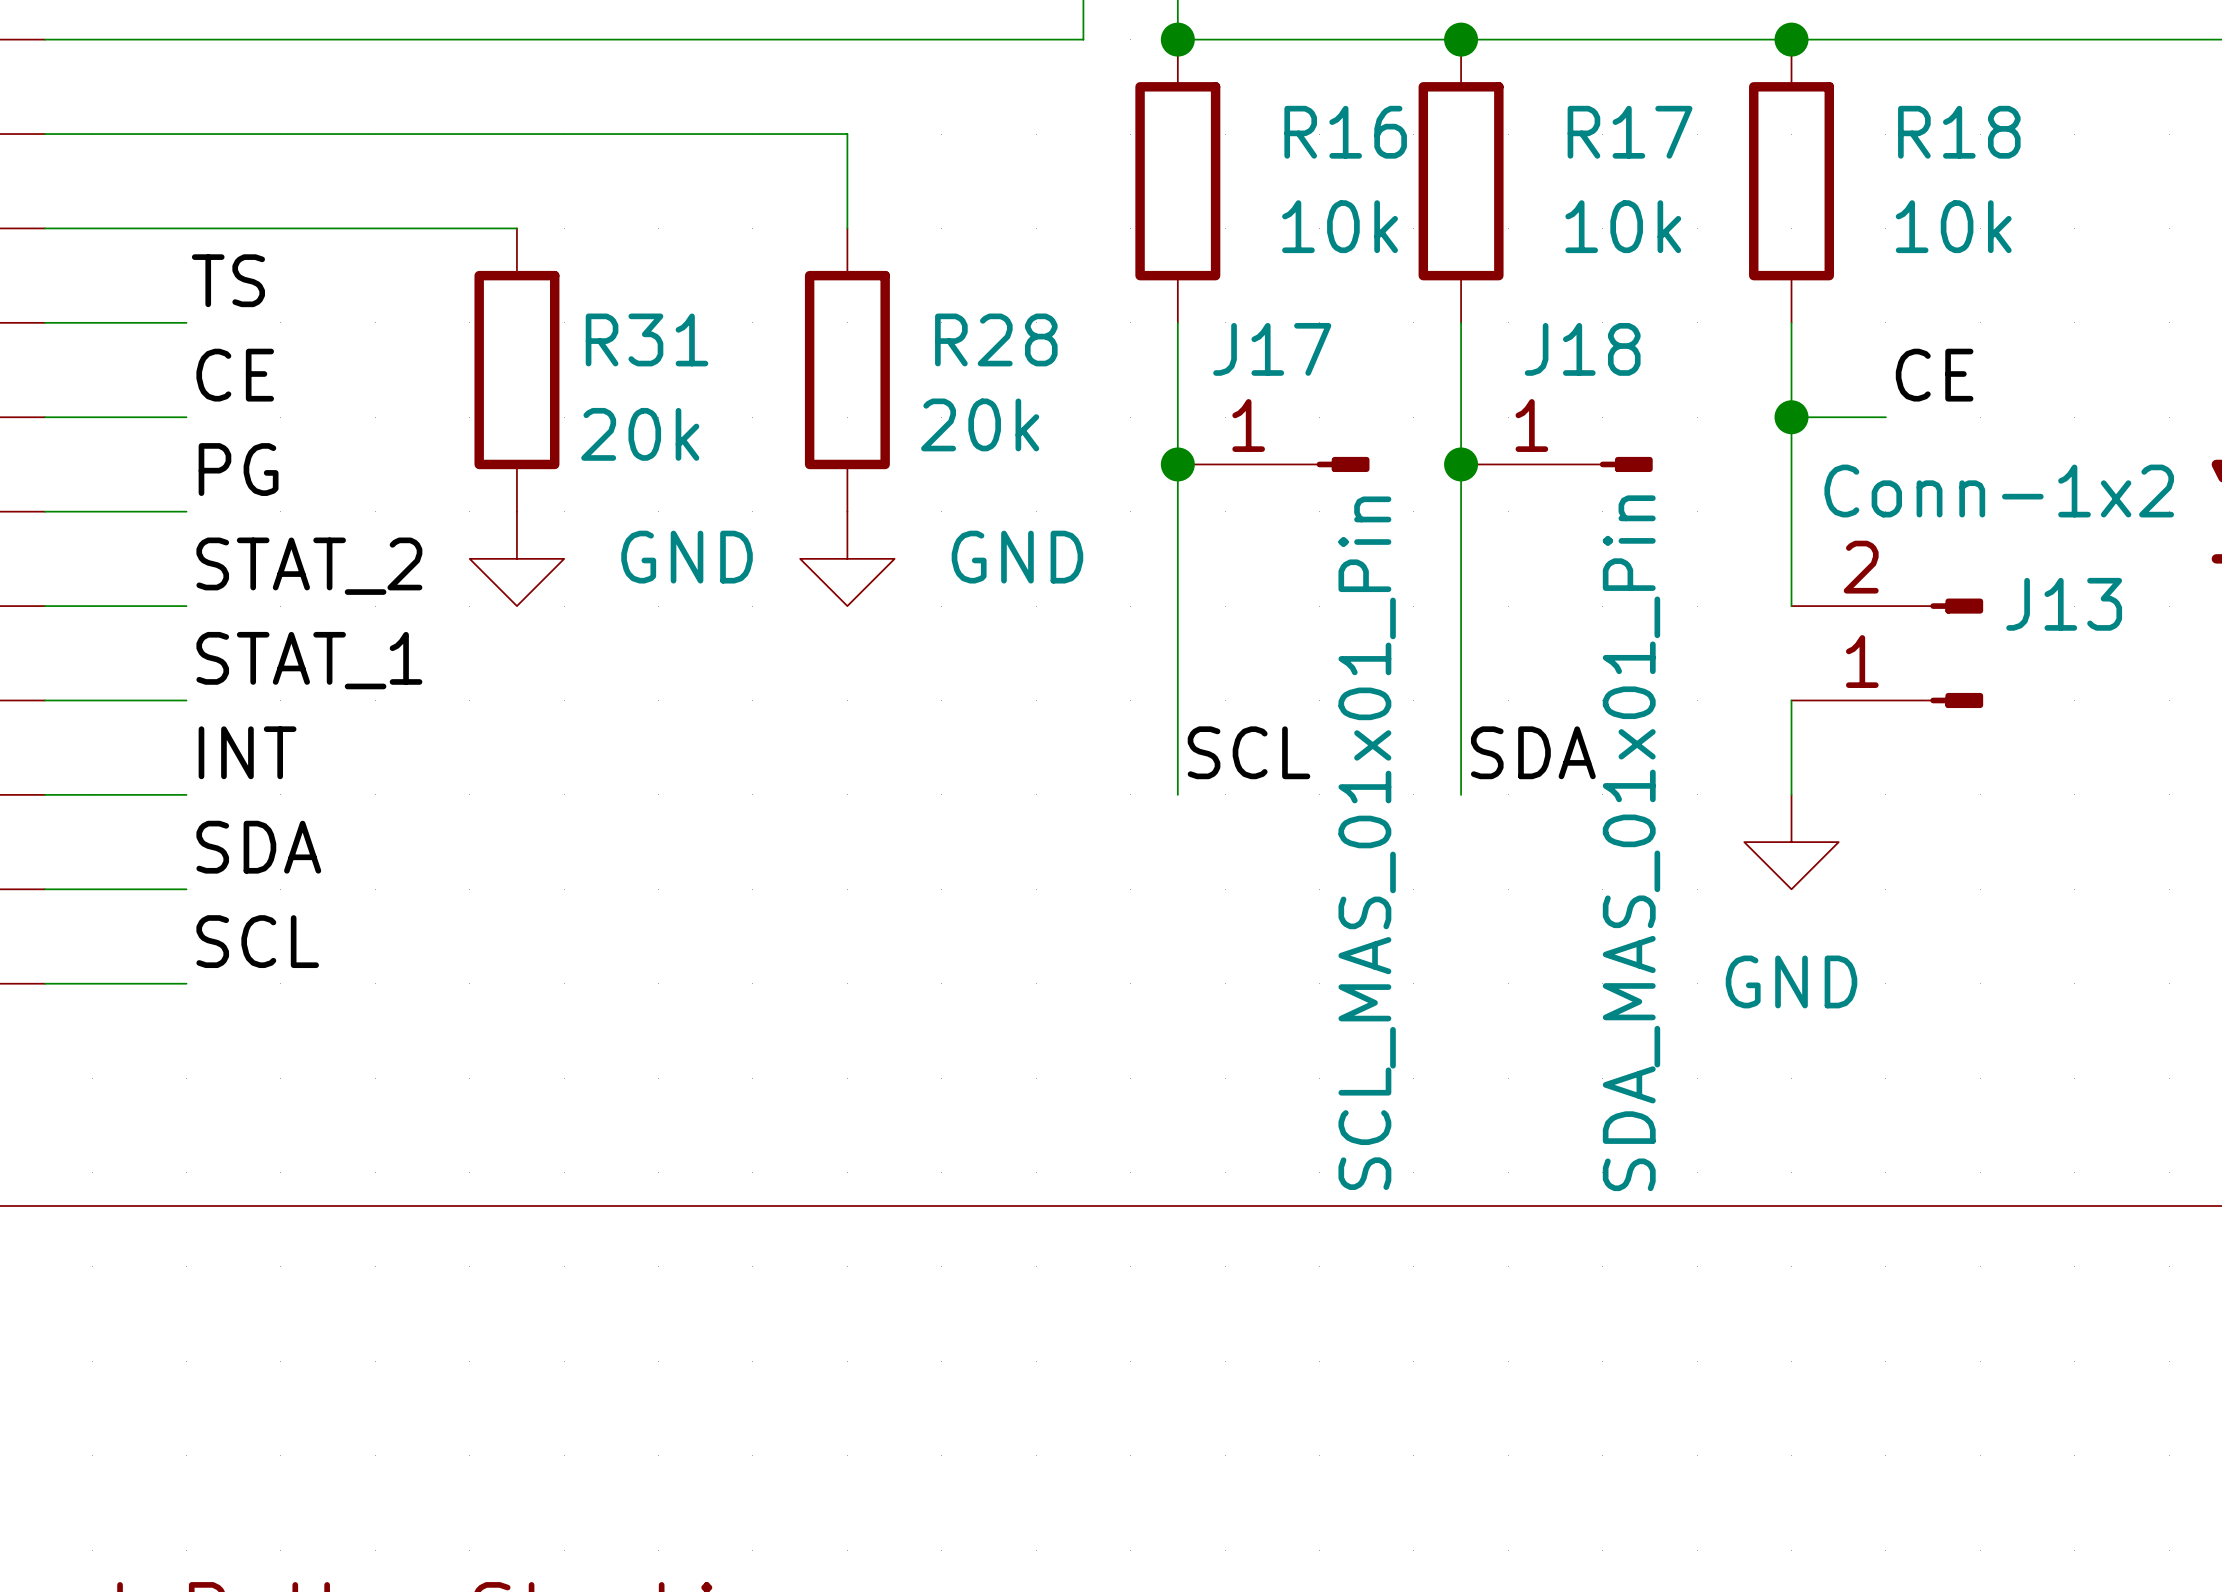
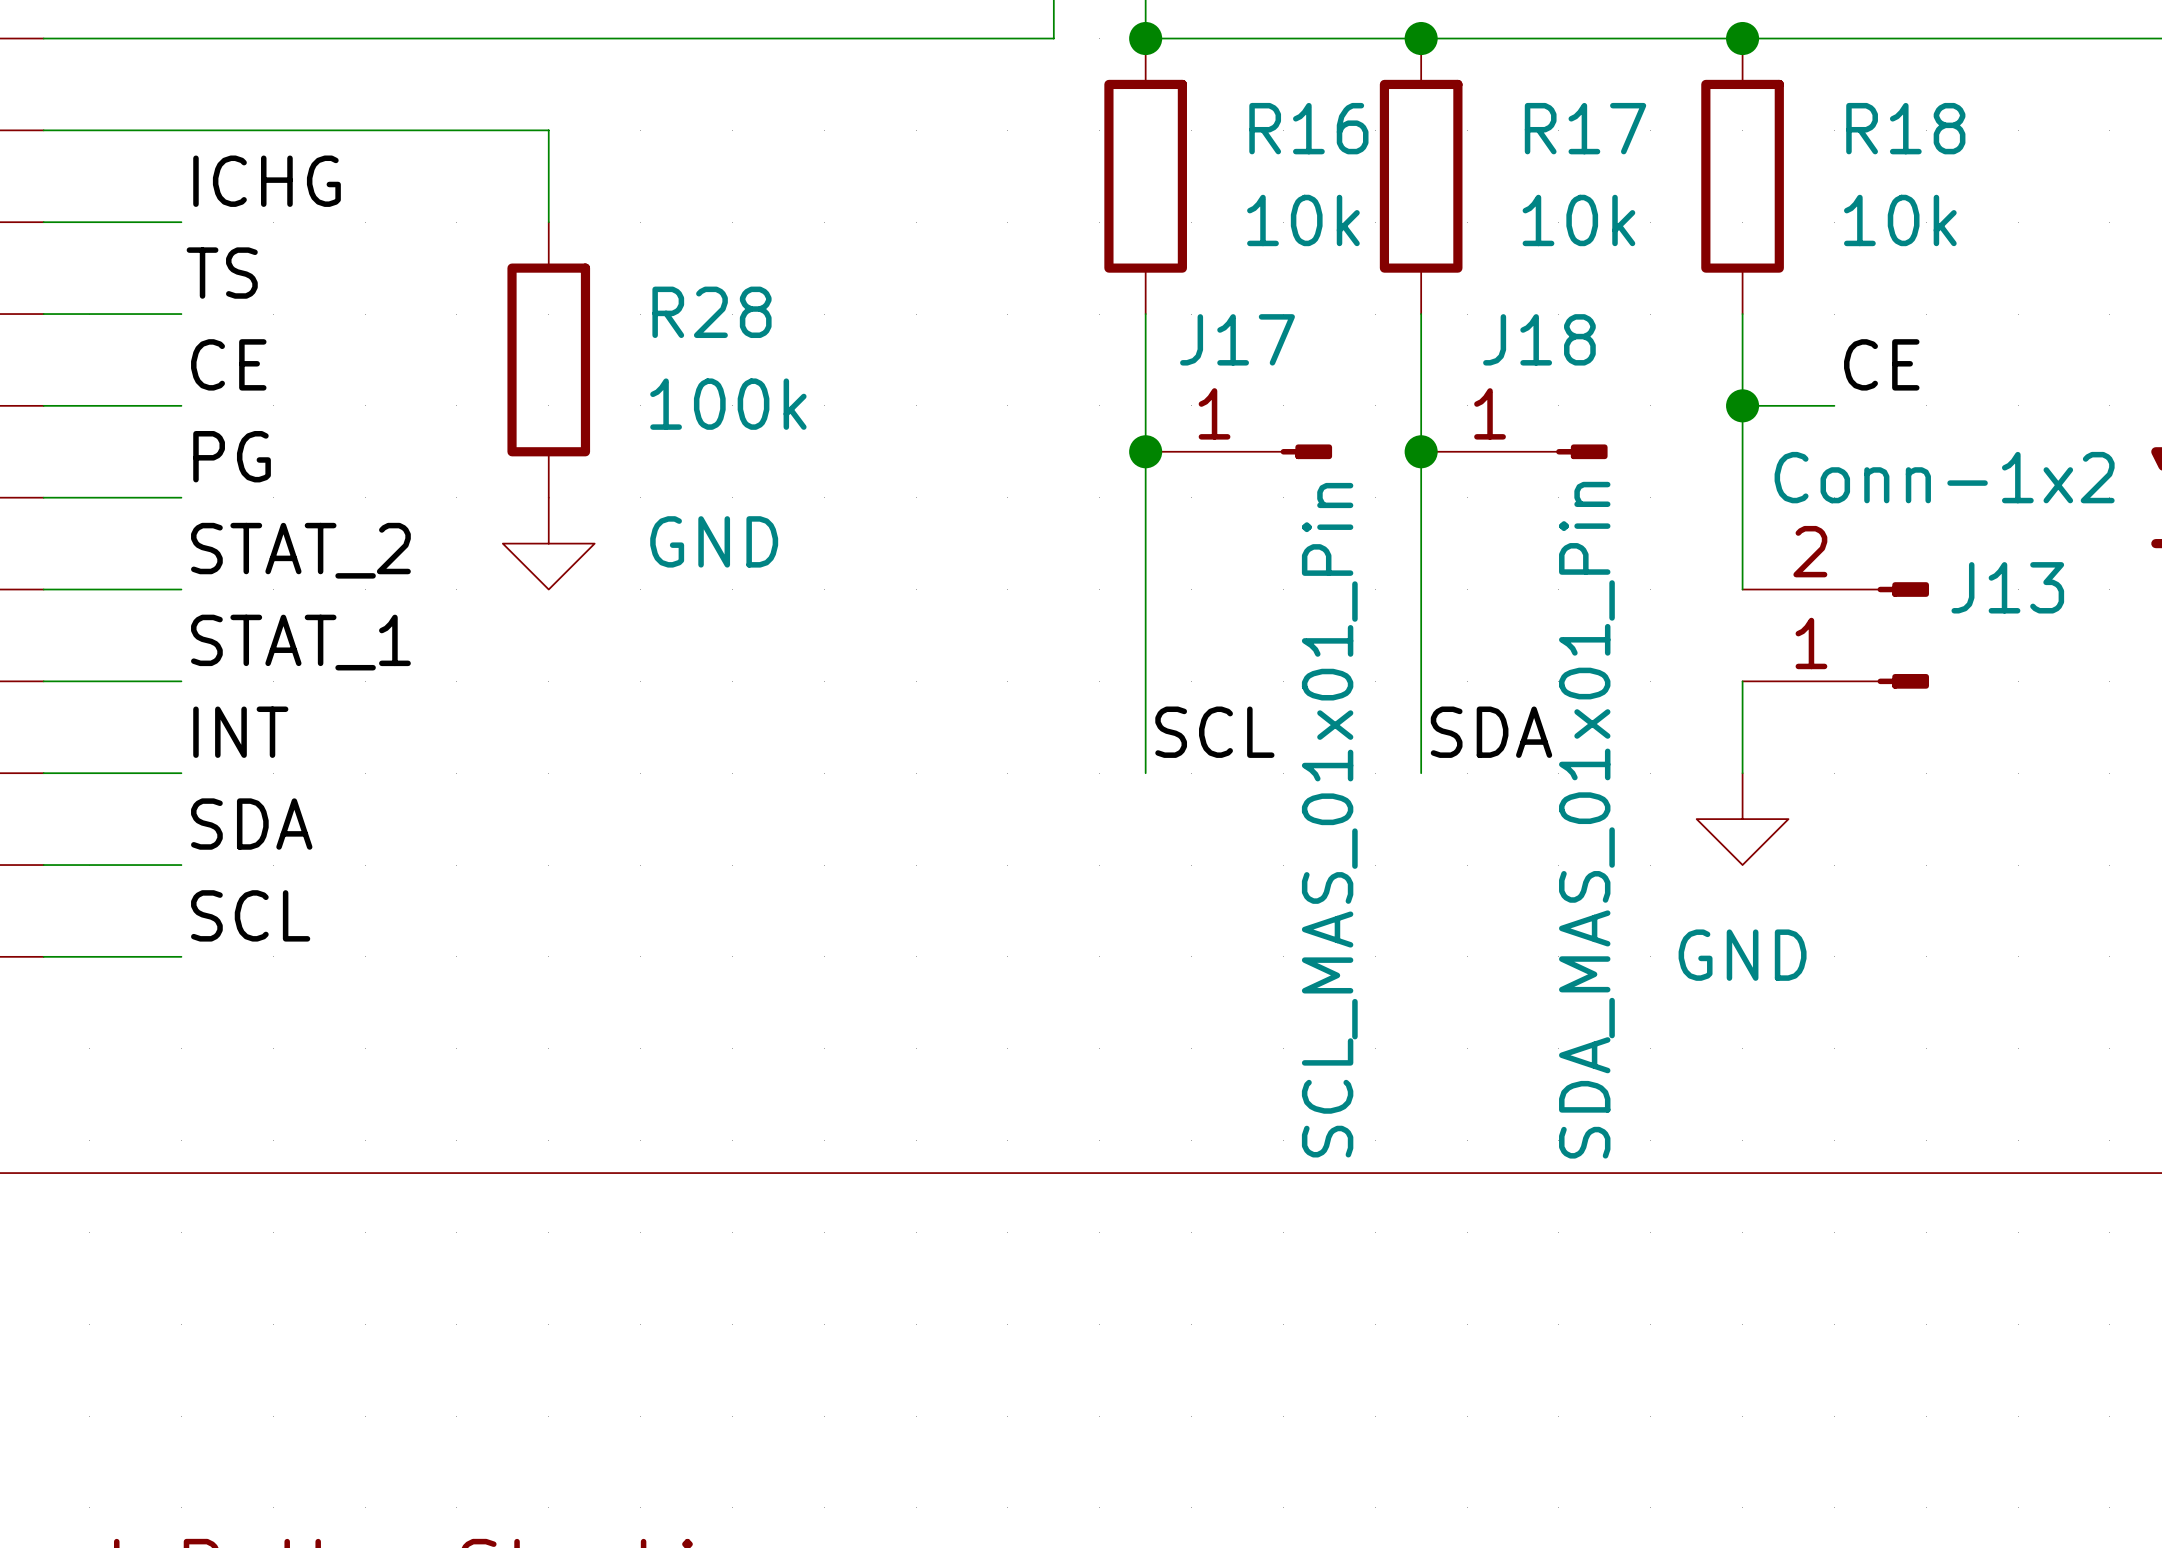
wire: (564, 134) (847, 134) (847, 228) -> (548, 130) (548, 222)
label: none -> ICHG (267, 181)
wire: (186, 228) (516, 228) -> none
R28 name position: R28 (996, 339) -> R28 (711, 312)
R31: 20k (516, 370) -> none
R28 position: (847, 370) -> (548, 359)
R28 value: 20k (980, 424) -> 100k (728, 404)
power symbol position: GND (516, 558) -> GND (548, 543)
power symbol: GND (847, 558) -> none

